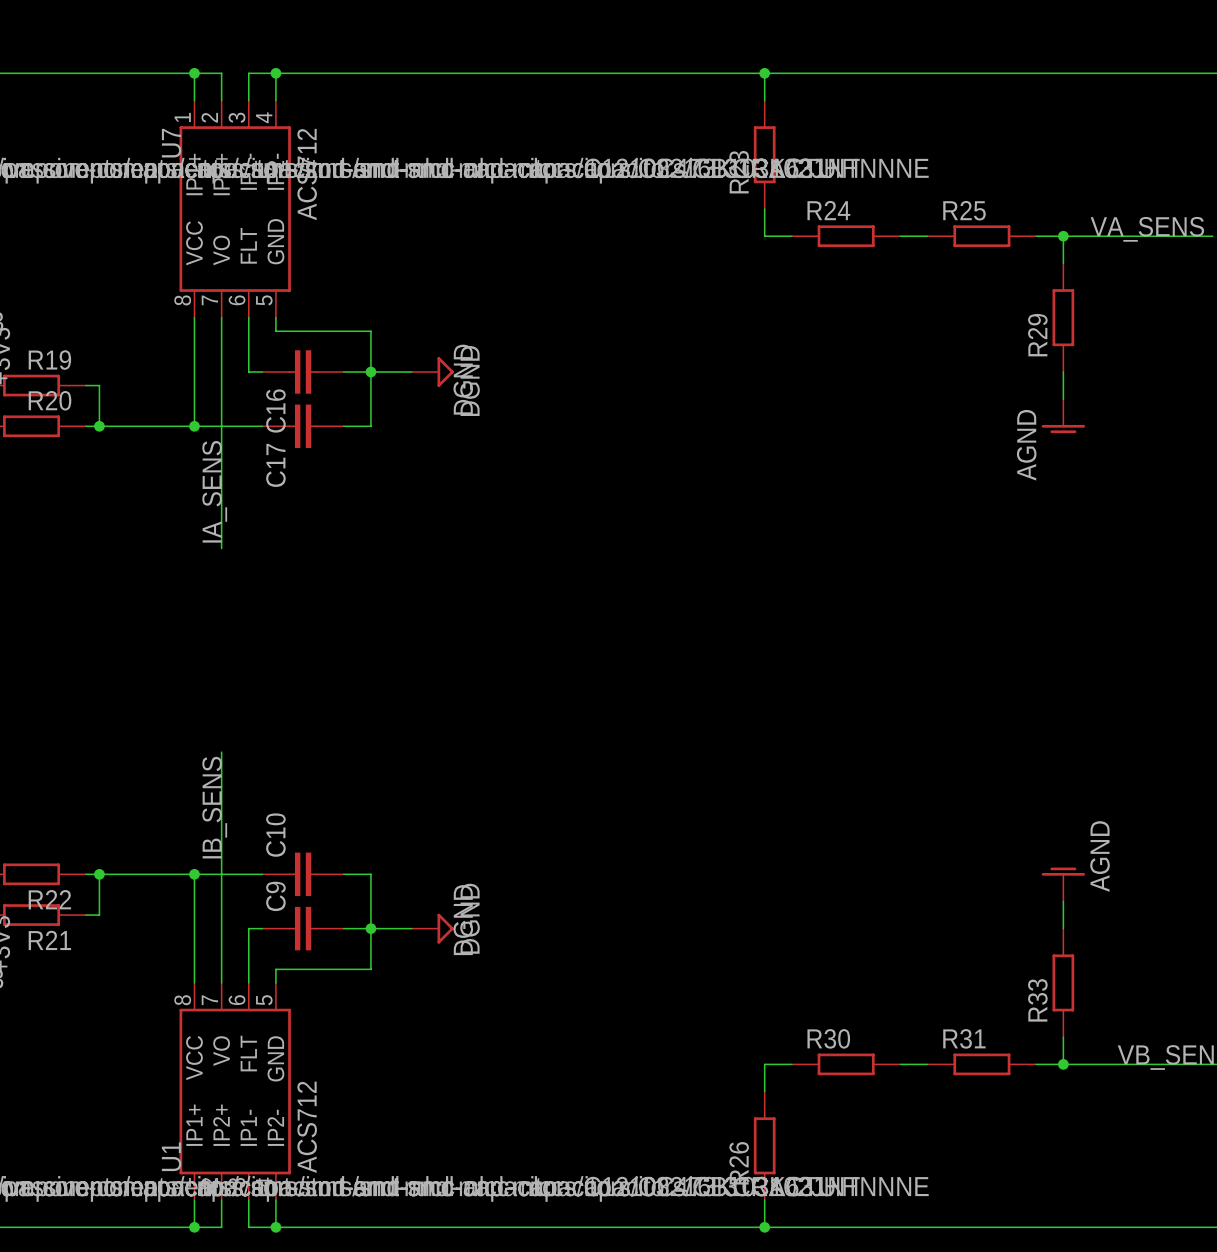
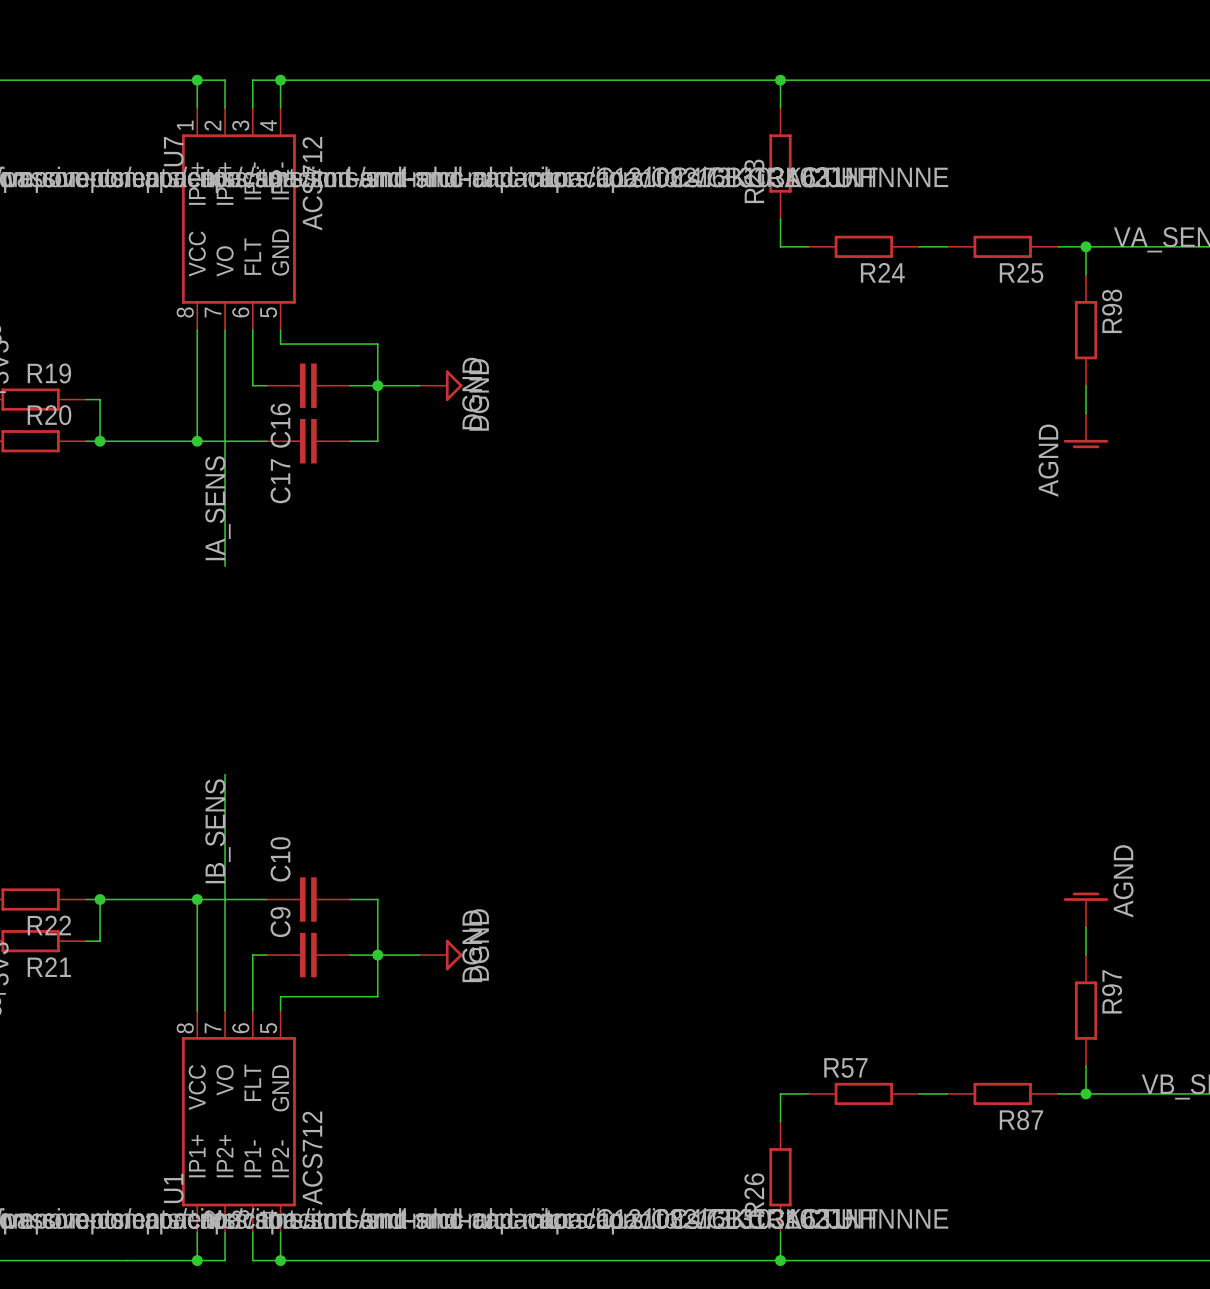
R24 name position: R24 (828, 210) -> R24 (882, 272)
R25 name position: R25 (964, 210) -> R25 (1021, 272)
R29 name: R29 (1037, 335) -> R98 (1112, 311)
R33 name: R33 (1037, 1000) -> R97 (1112, 991)
R30 name: R30 (828, 1038) -> R57 (845, 1067)
R31 name: R31 (964, 1038) -> R87 (1021, 1120)

